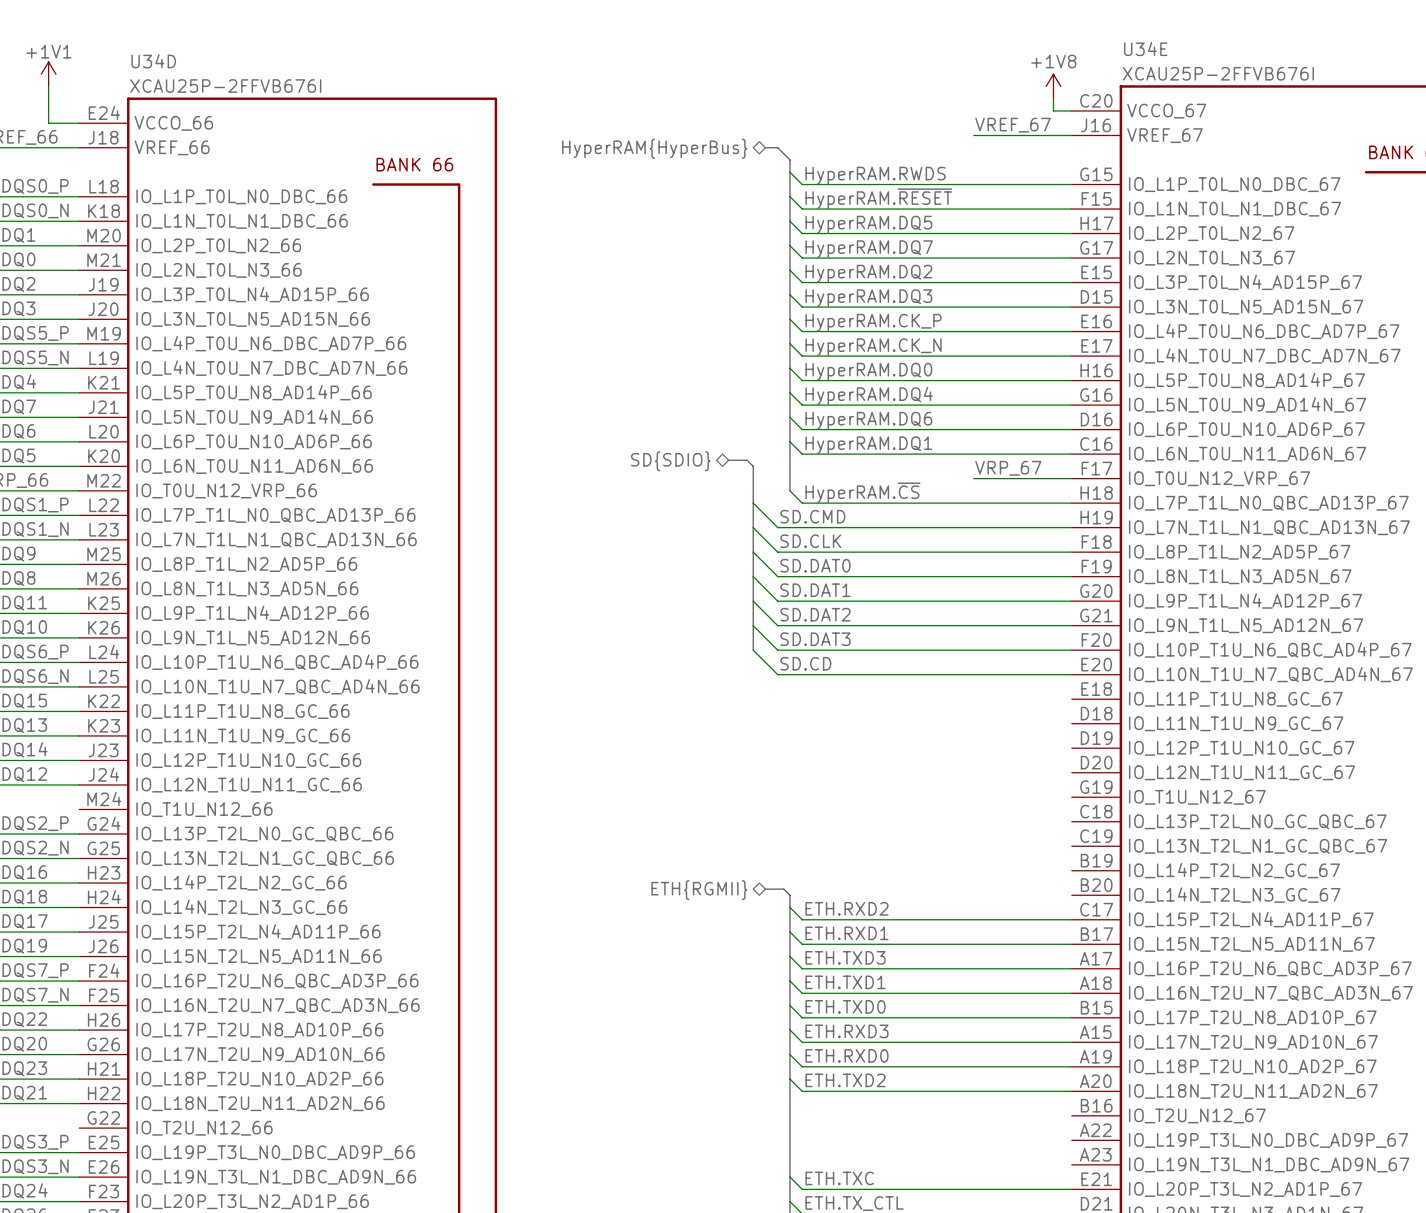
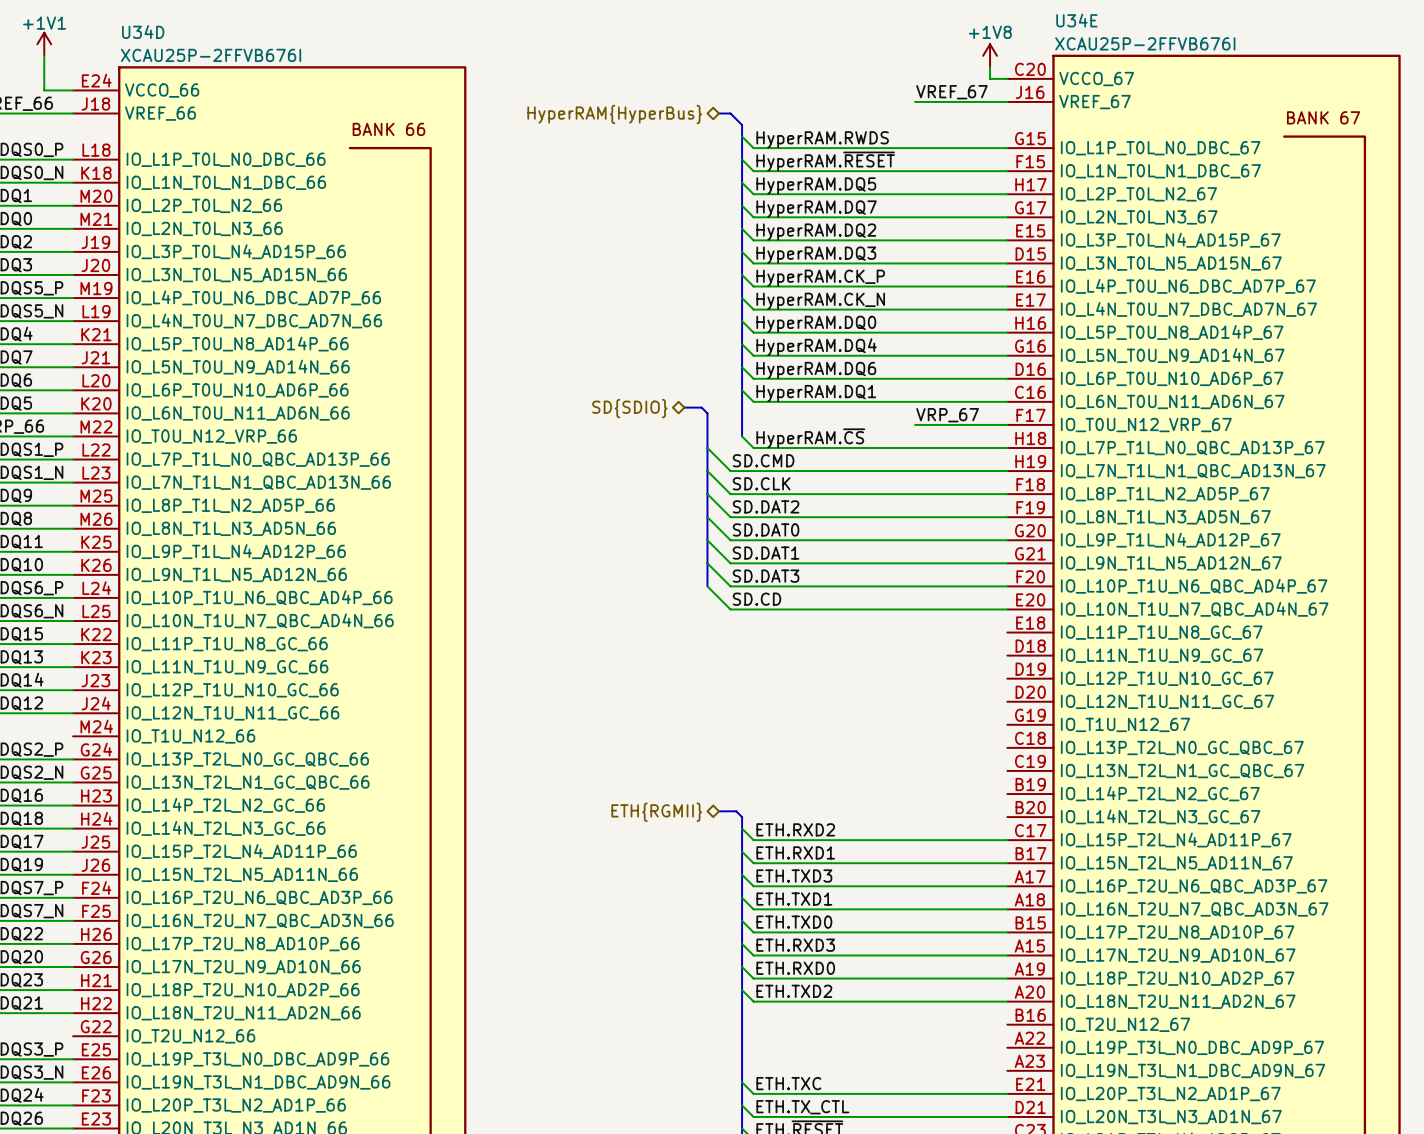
label: SD.DAT0 (815, 565) -> SD.DAT2 (766, 506)
label: SD.DAT1 (815, 590) -> SD.DAT0 (766, 529)
label: SD.DAT2 (815, 614) -> SD.DAT1 (766, 553)

